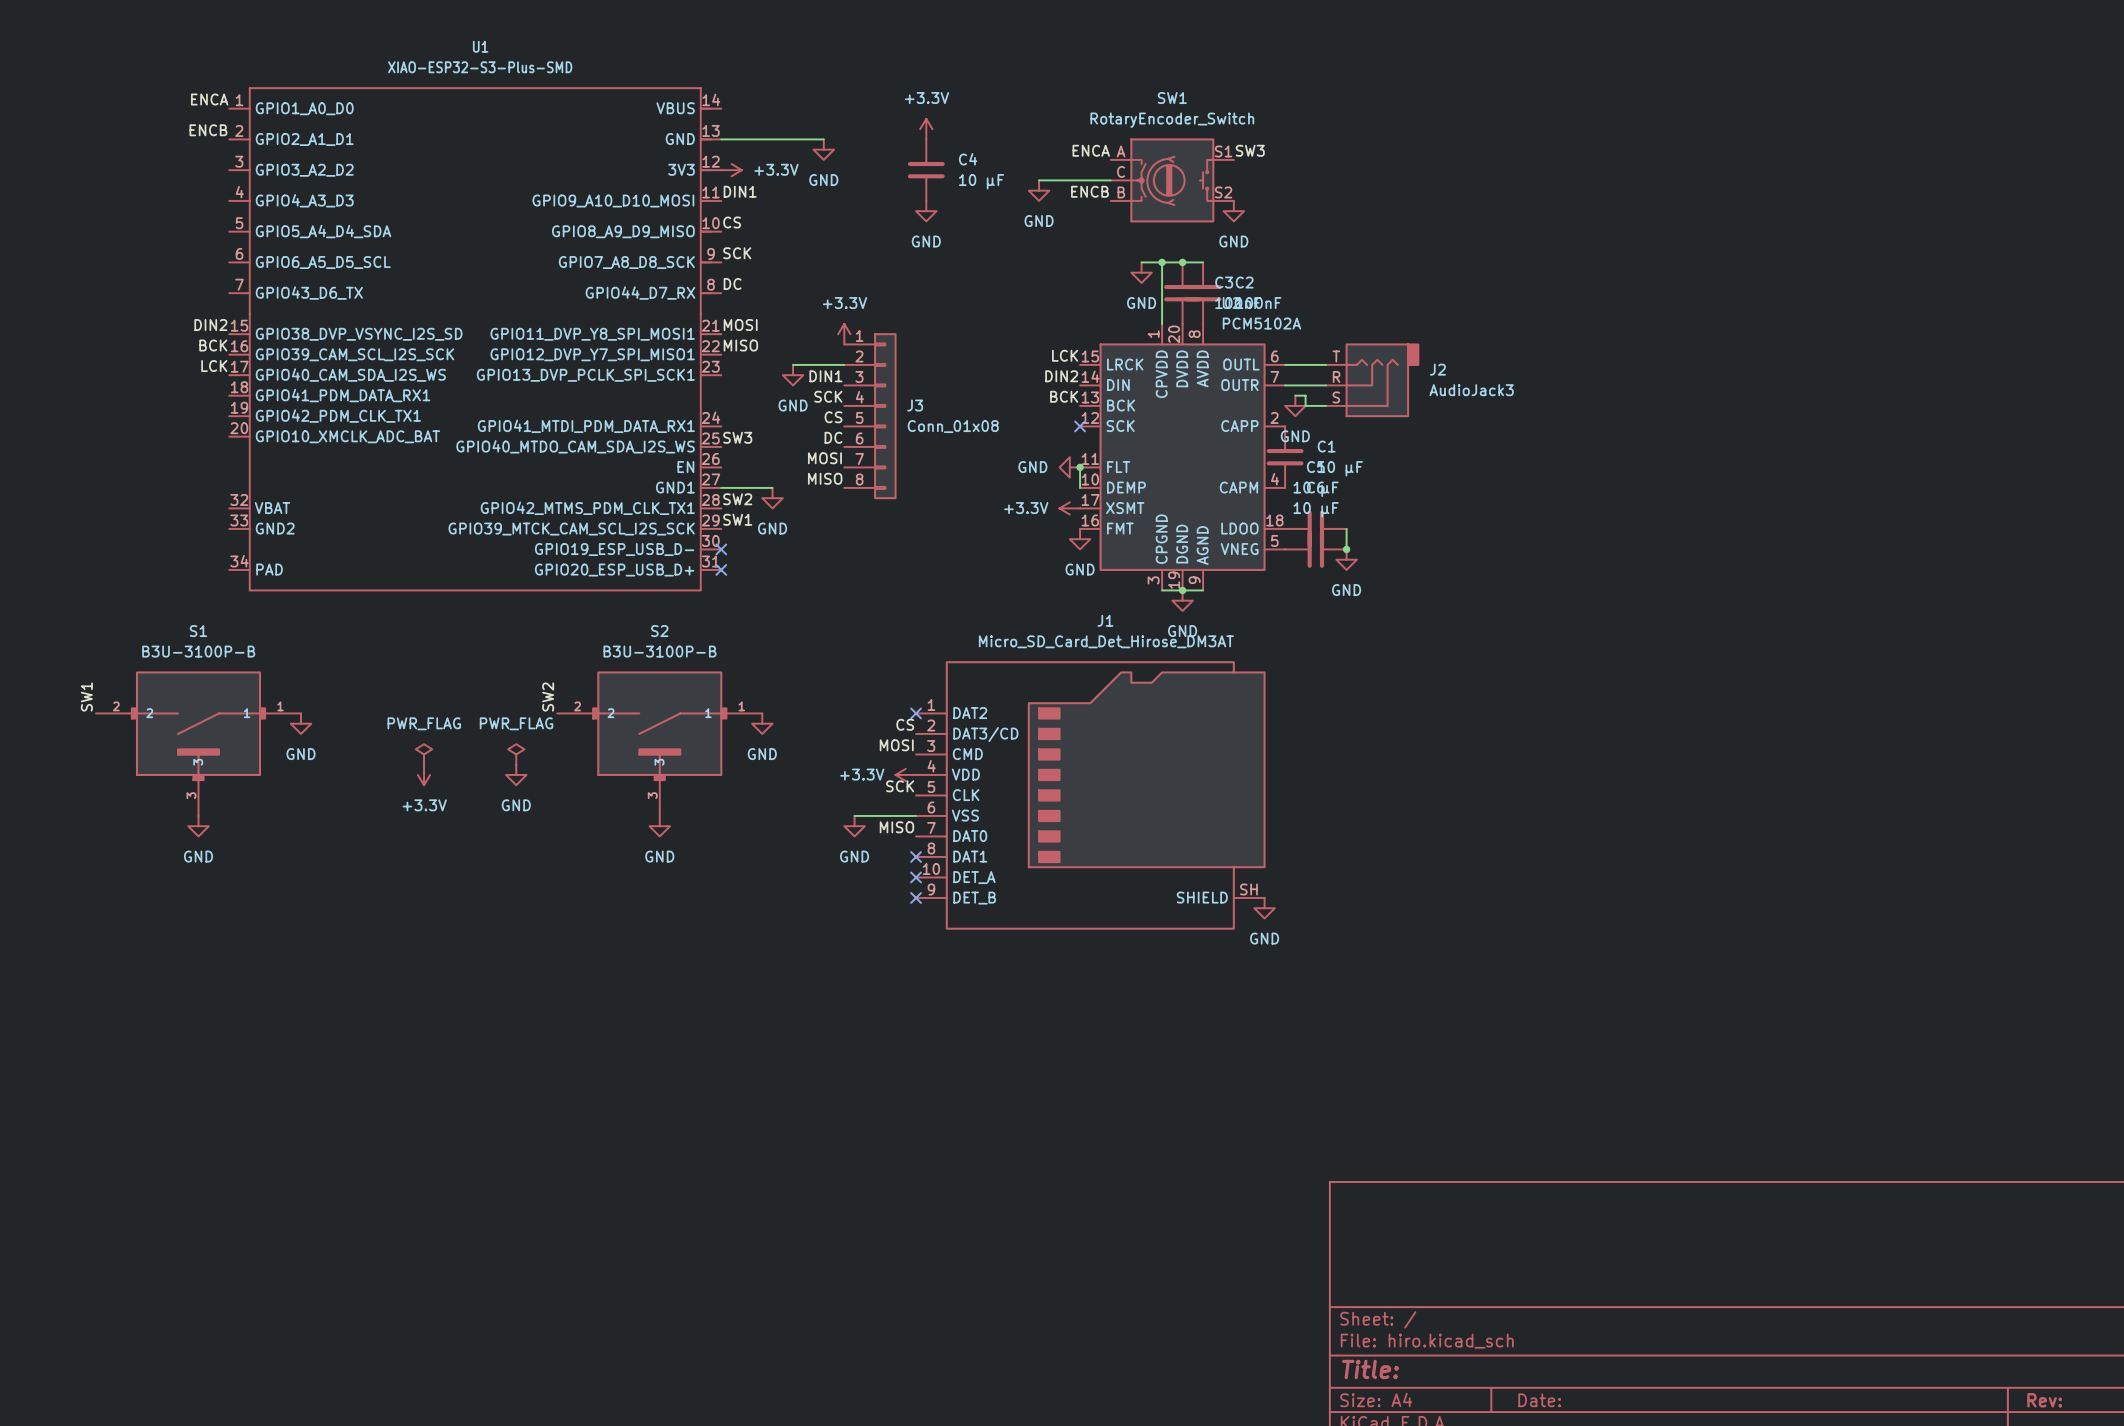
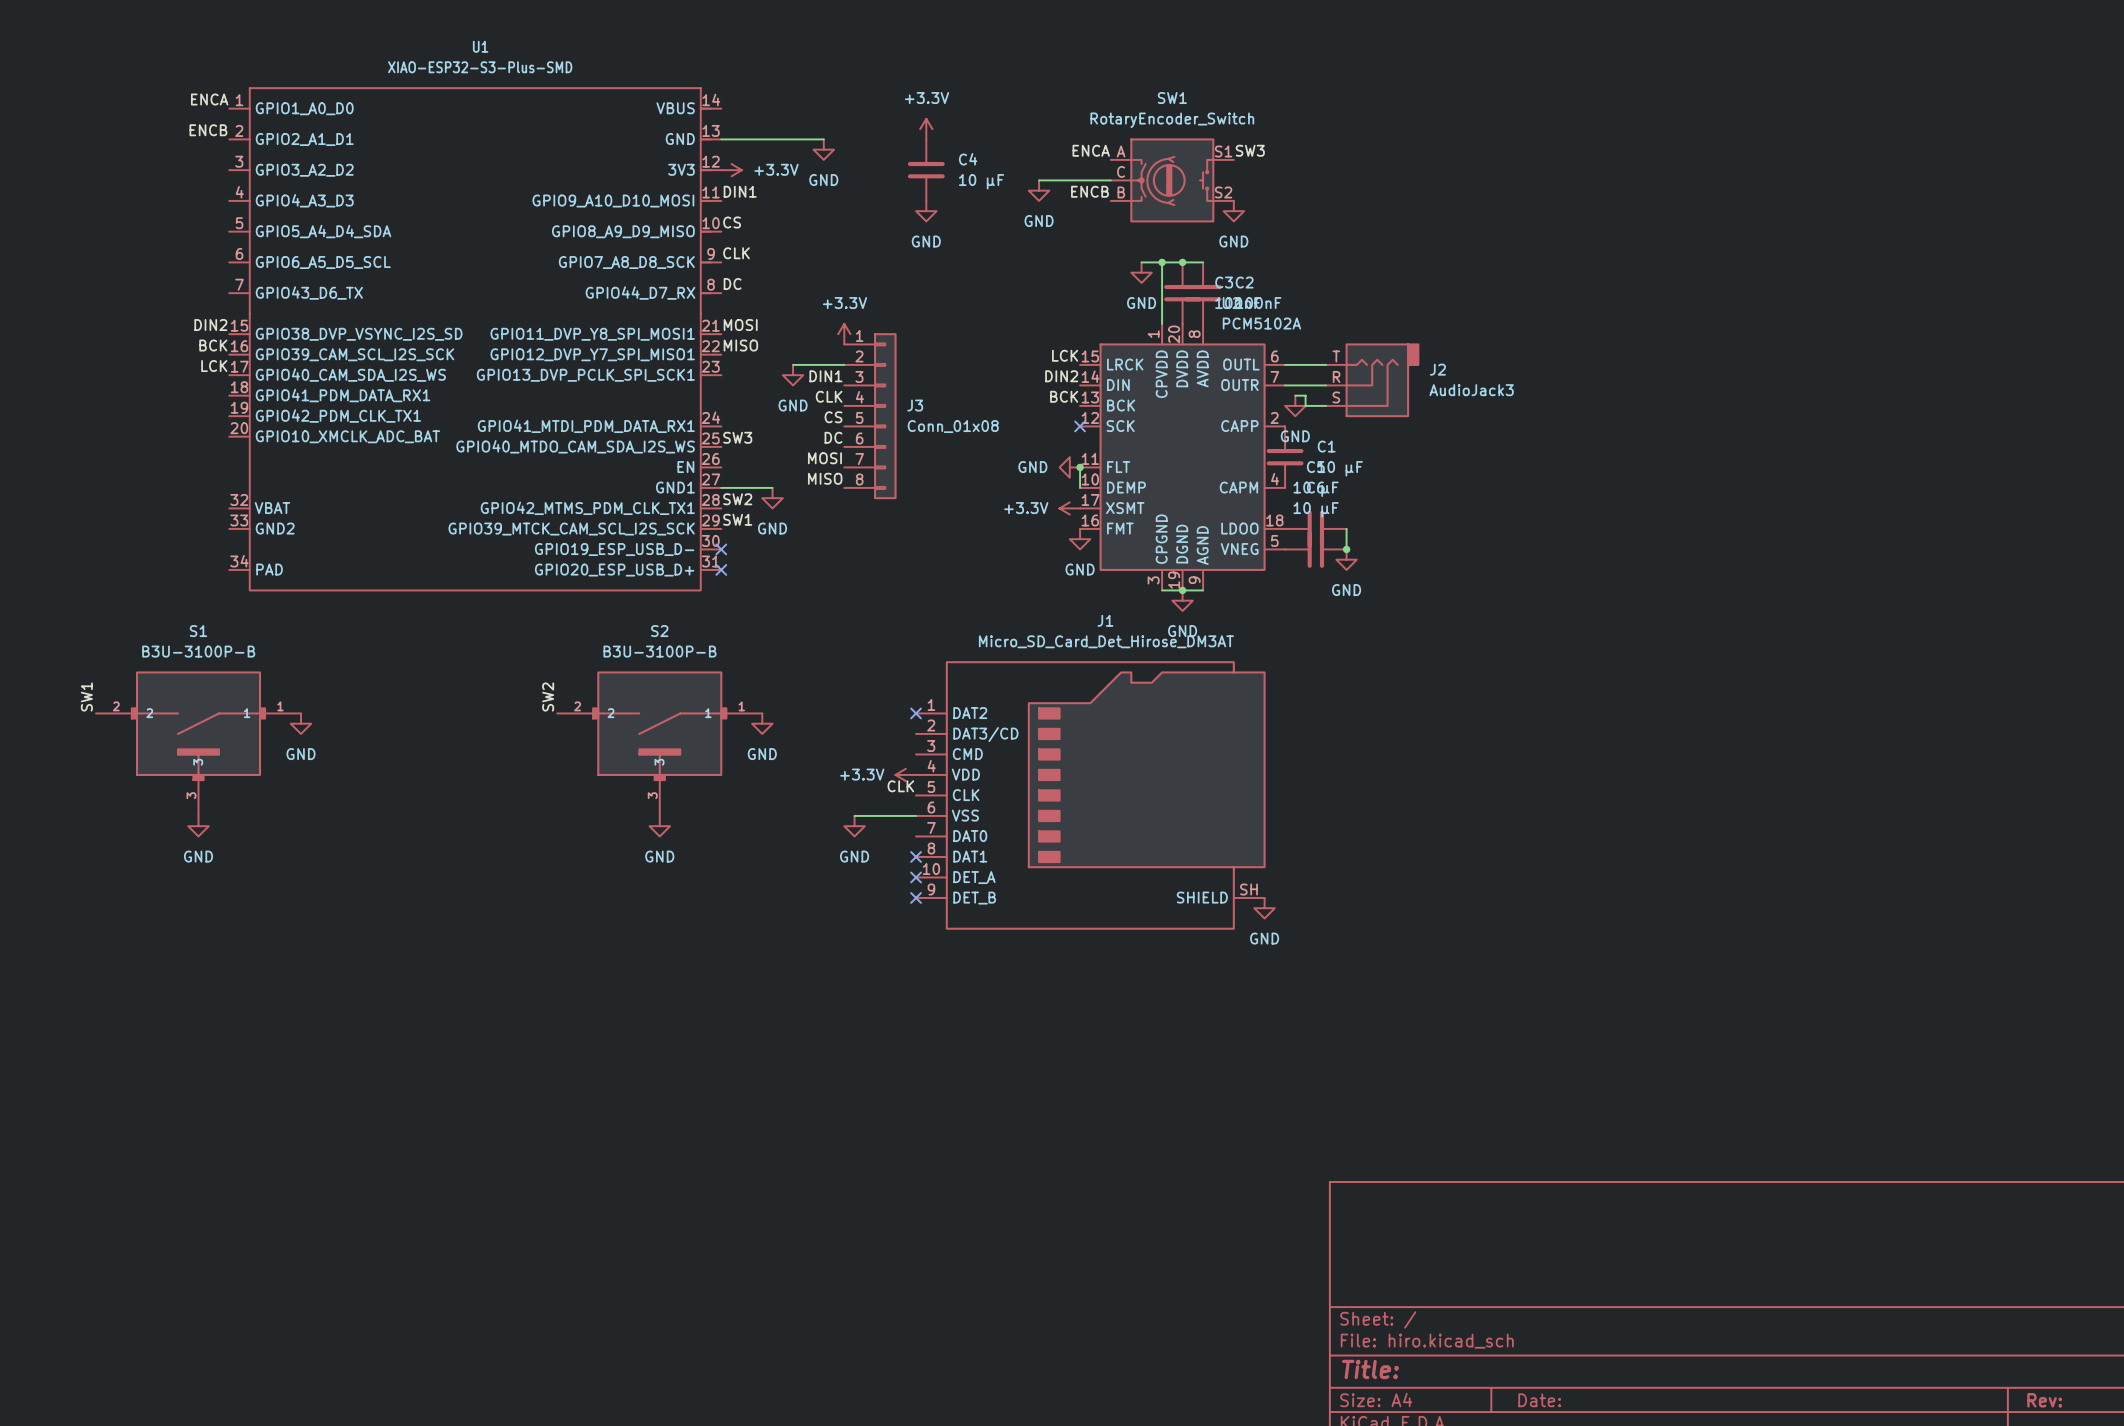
label: SCK (737, 253) -> CLK (736, 253)
label: SCK (828, 396) -> CLK (829, 396)
label: CS (905, 724) -> none
label: MOSI (896, 745) -> none
power symbol: PWR_FLAG (424, 754) -> none
power symbol: PWR_FLAG (516, 754) -> none
power symbol: +3.3V (424, 774) -> none
power symbol: GND (516, 774) -> none
label: SCK (900, 786) -> CLK (900, 786)
label: MISO (896, 827) -> none

